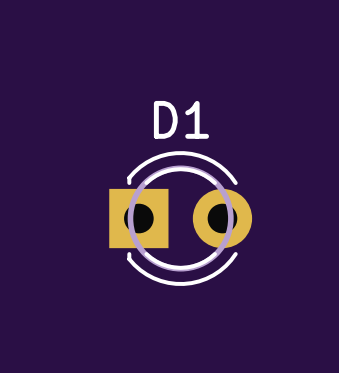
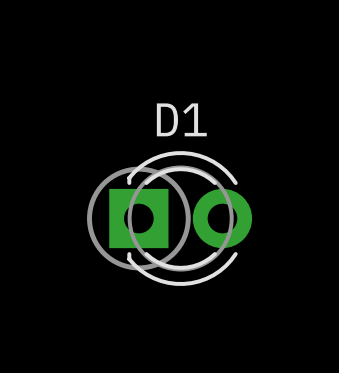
D1 footprint: [109, 151, 253, 286] -> [87, 151, 253, 286]

